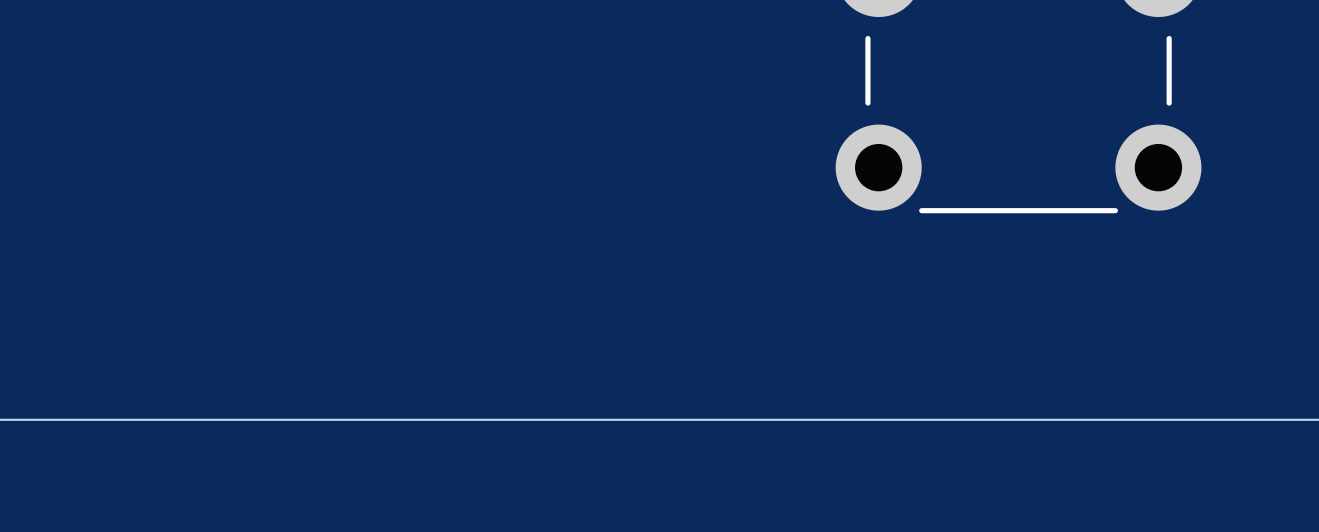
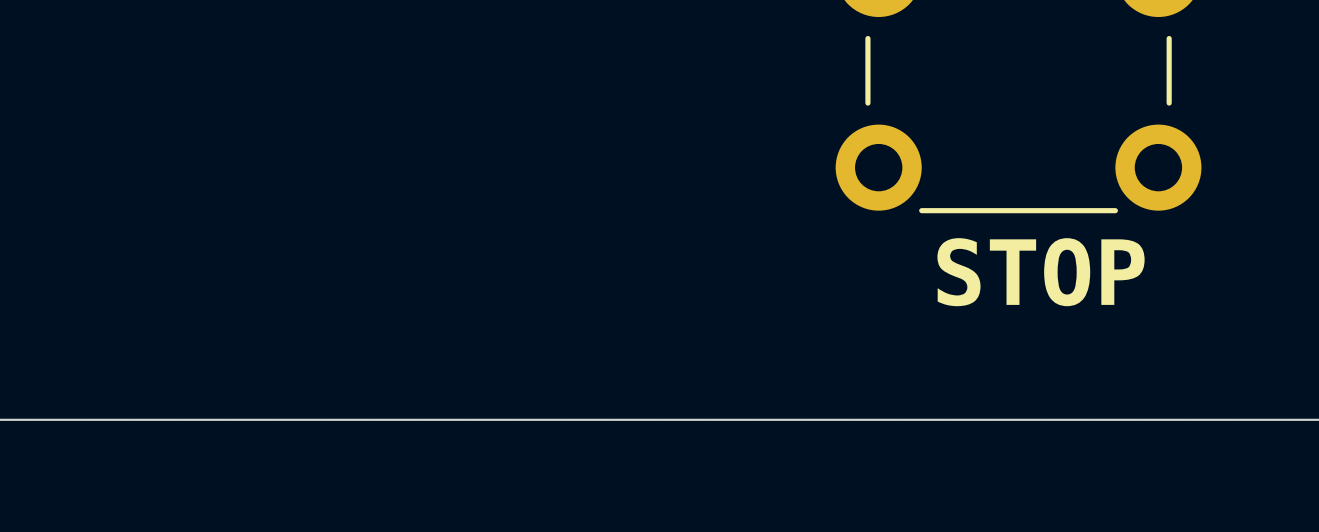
part value: none -> STOP (1041, 272)

